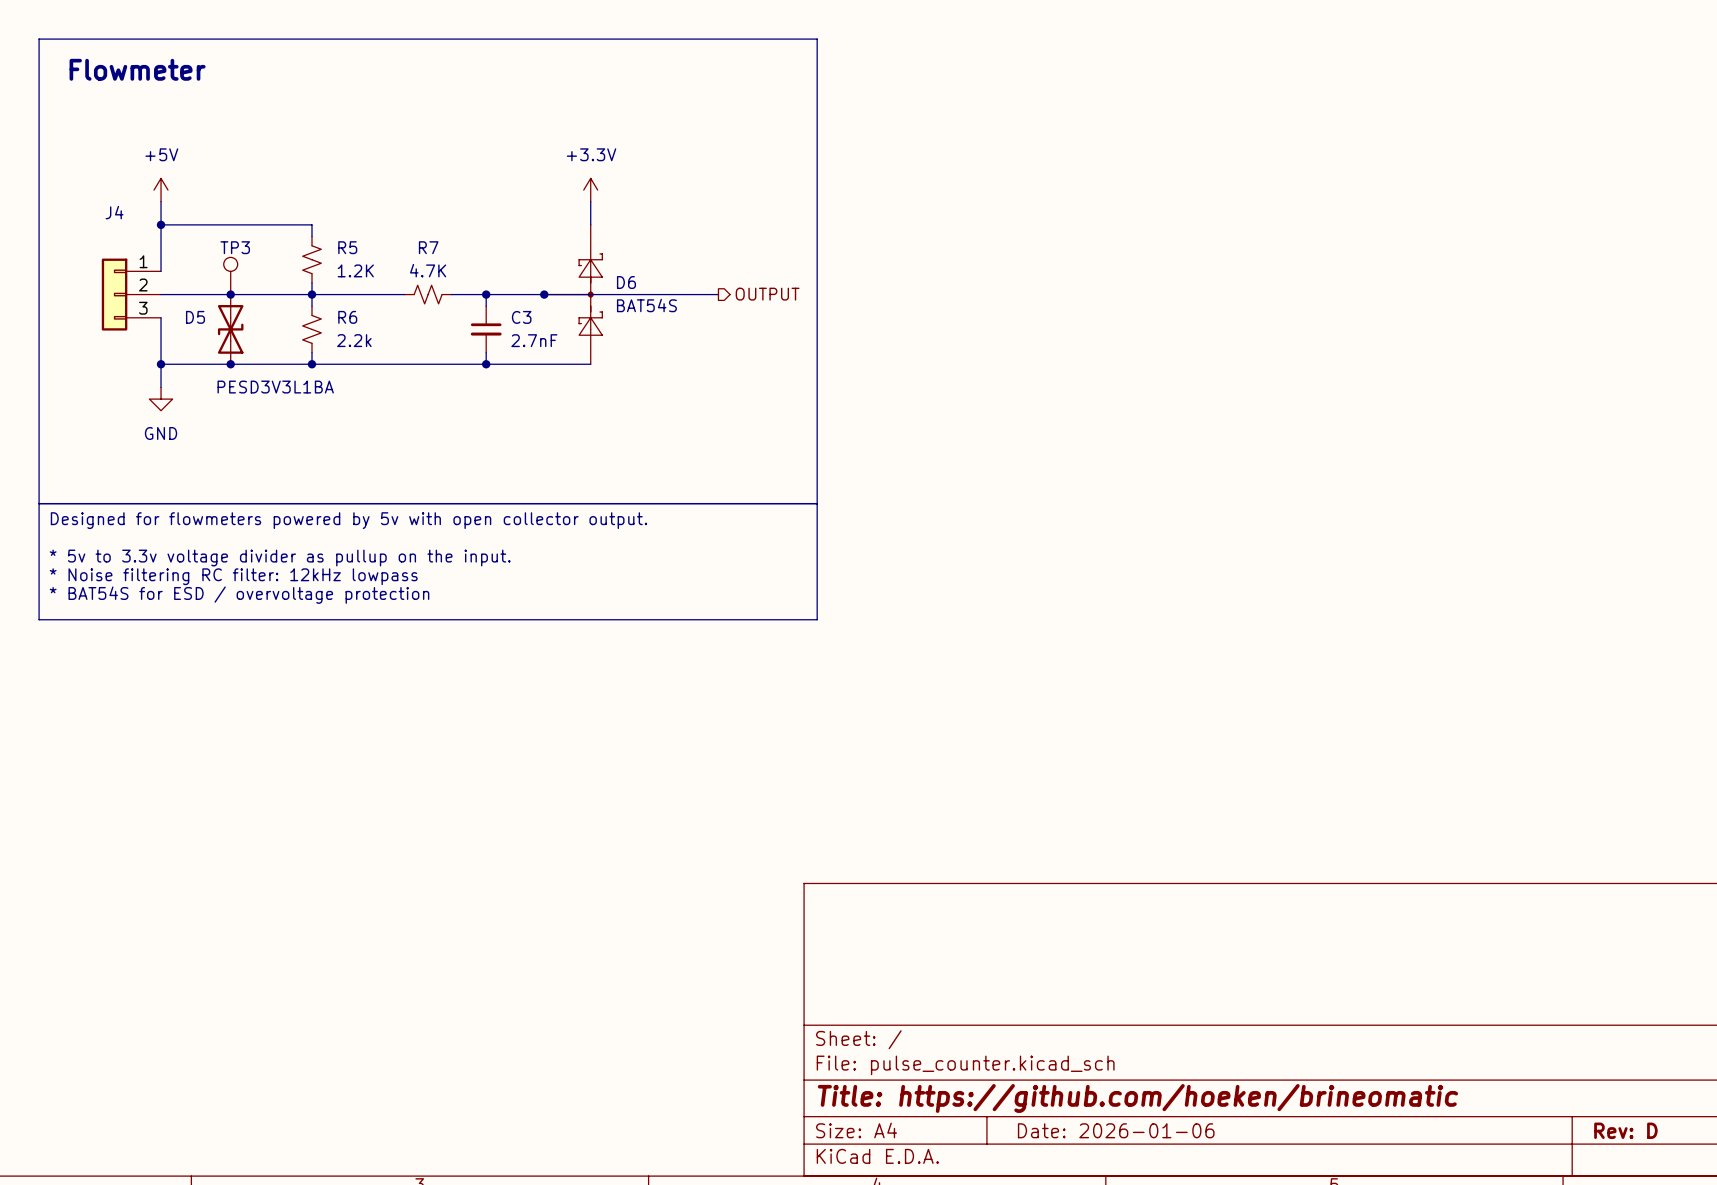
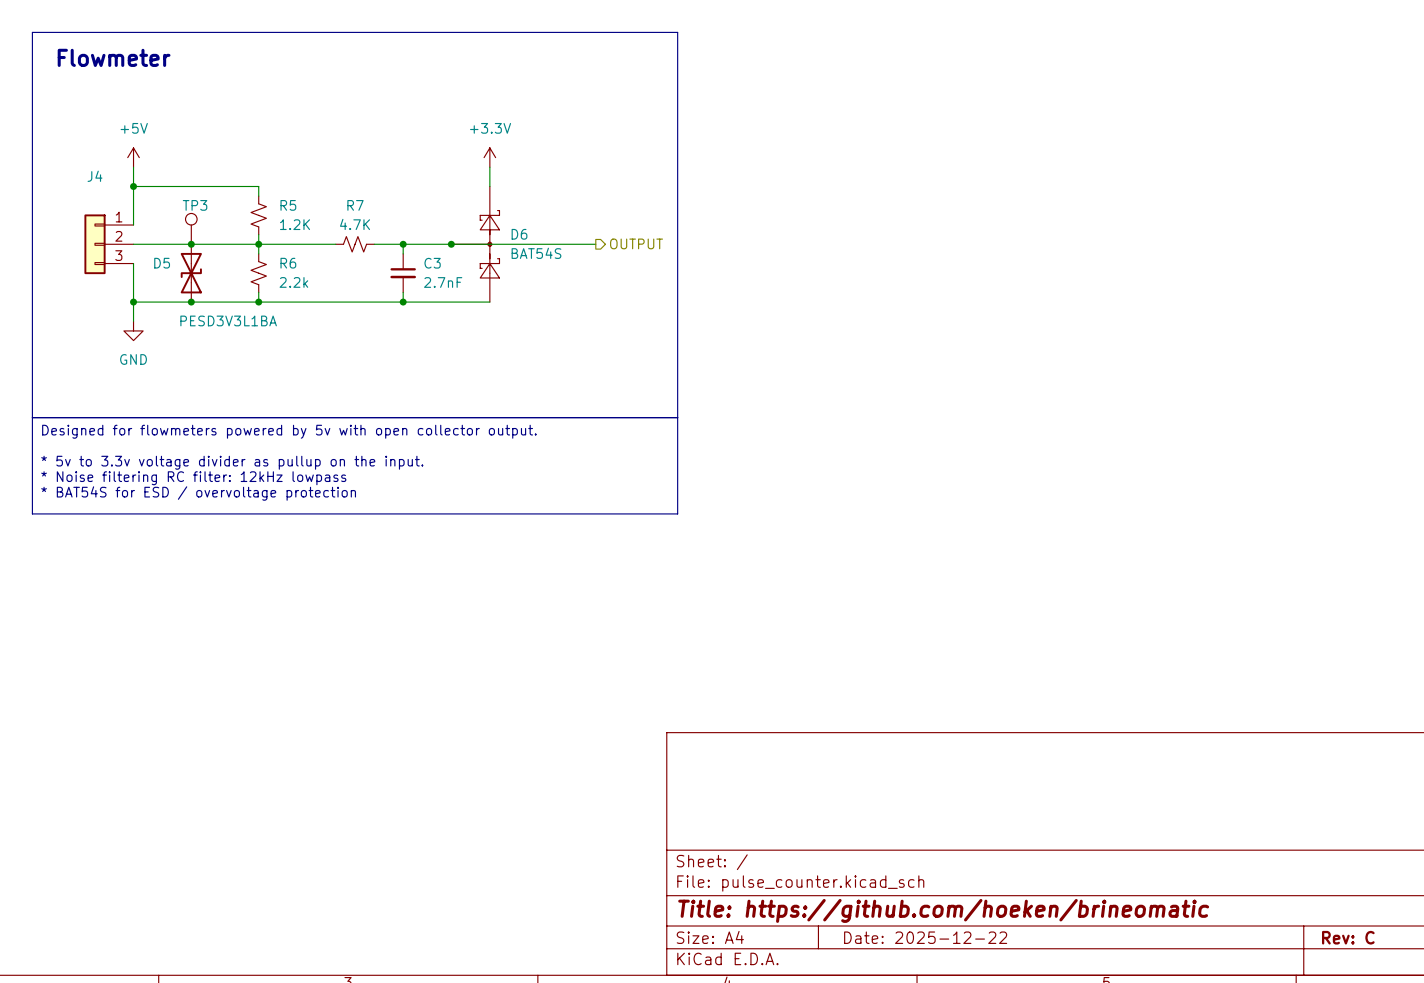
title block: Date: 2026-01-06 (1116, 1130) -> Date: 2025-12-22 (925, 937)
title block: Rev: D (1625, 1130) -> Rev: C (1348, 937)

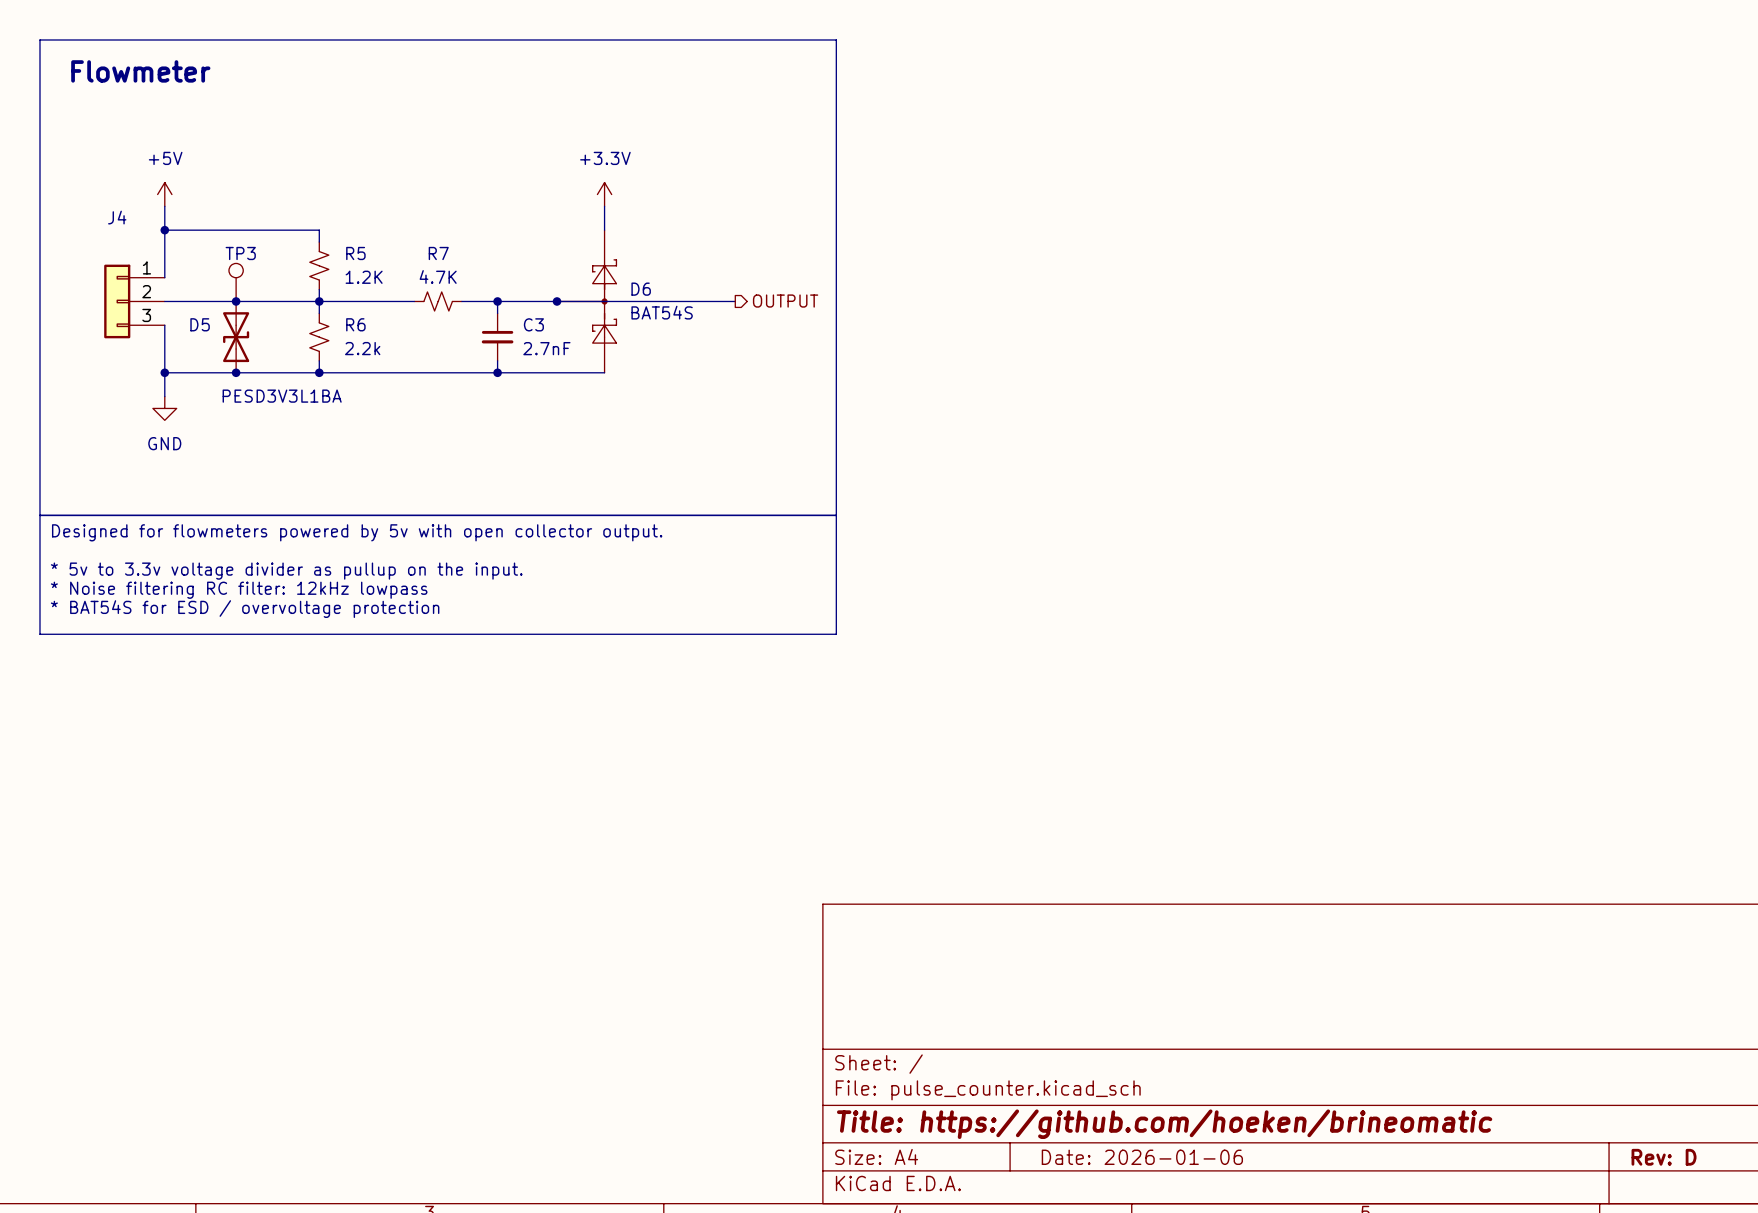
title block: Date: 2025-12-22 (925, 937) -> Date: 2026-01-06 (1142, 1157)
title block: Rev: C (1348, 937) -> Rev: D (1664, 1157)

